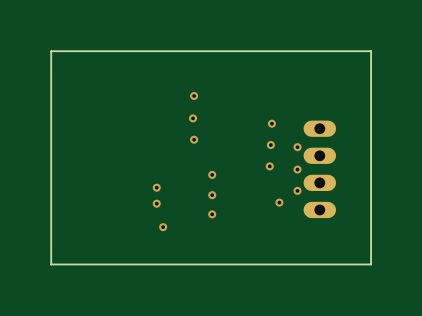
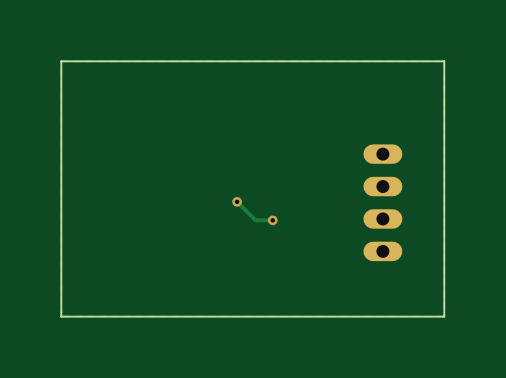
via: (194, 95) -> none
via: (193, 118) -> none
via: (271, 123) -> none
via: (194, 139) -> none
via: (270, 145) -> none
via: (297, 147) -> none
via: (269, 166) -> none
track: none -> (237, 201) (255, 220) (272, 220)
via: none -> (237, 201)
via: (297, 169) -> none
via: (212, 174) -> none
via: none -> (272, 220)
via: (156, 187) -> none
via: (297, 190) -> none
via: (212, 195) -> none
via: (279, 202) -> none
via: (156, 203) -> none
via: (212, 214) -> none
via: (163, 227) -> none

